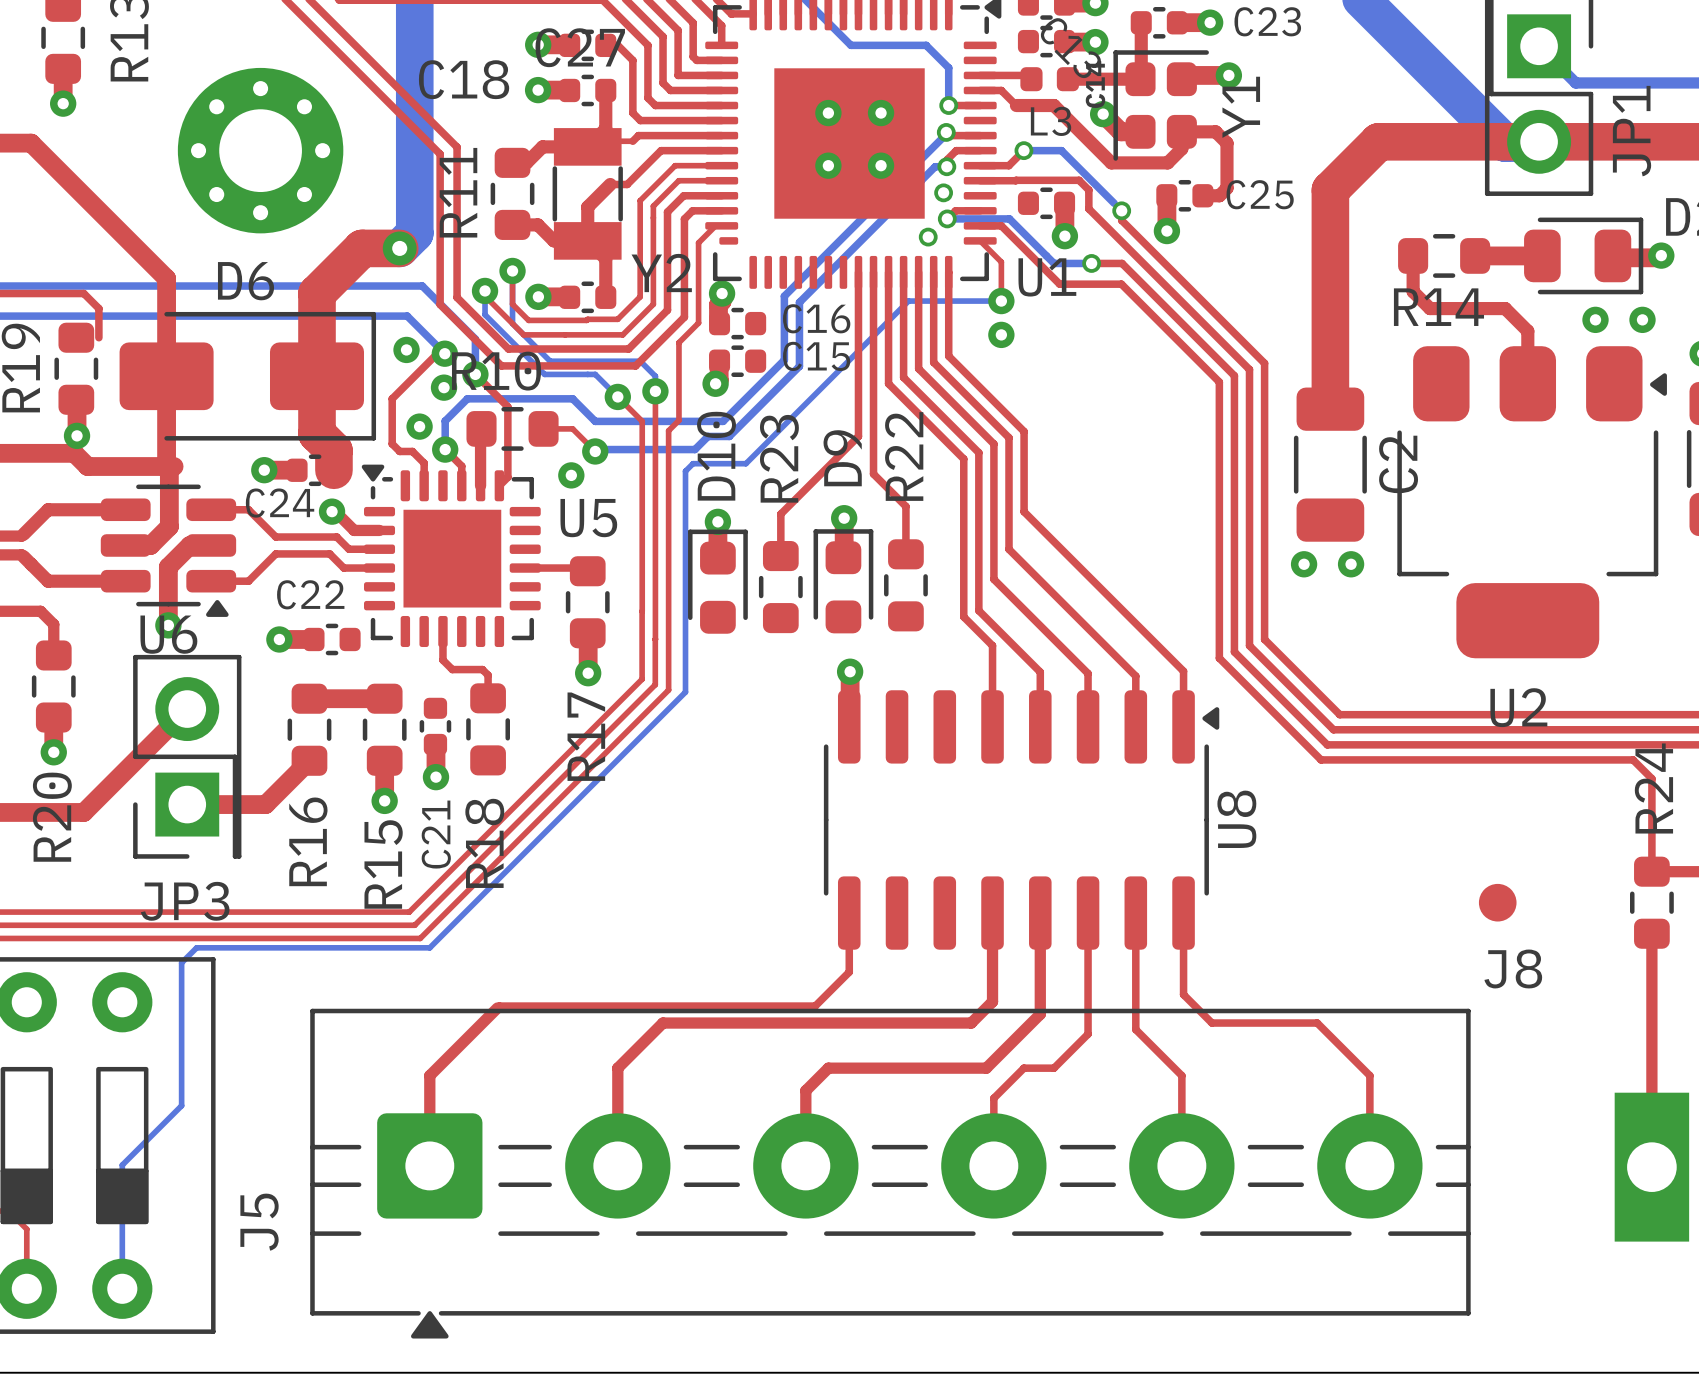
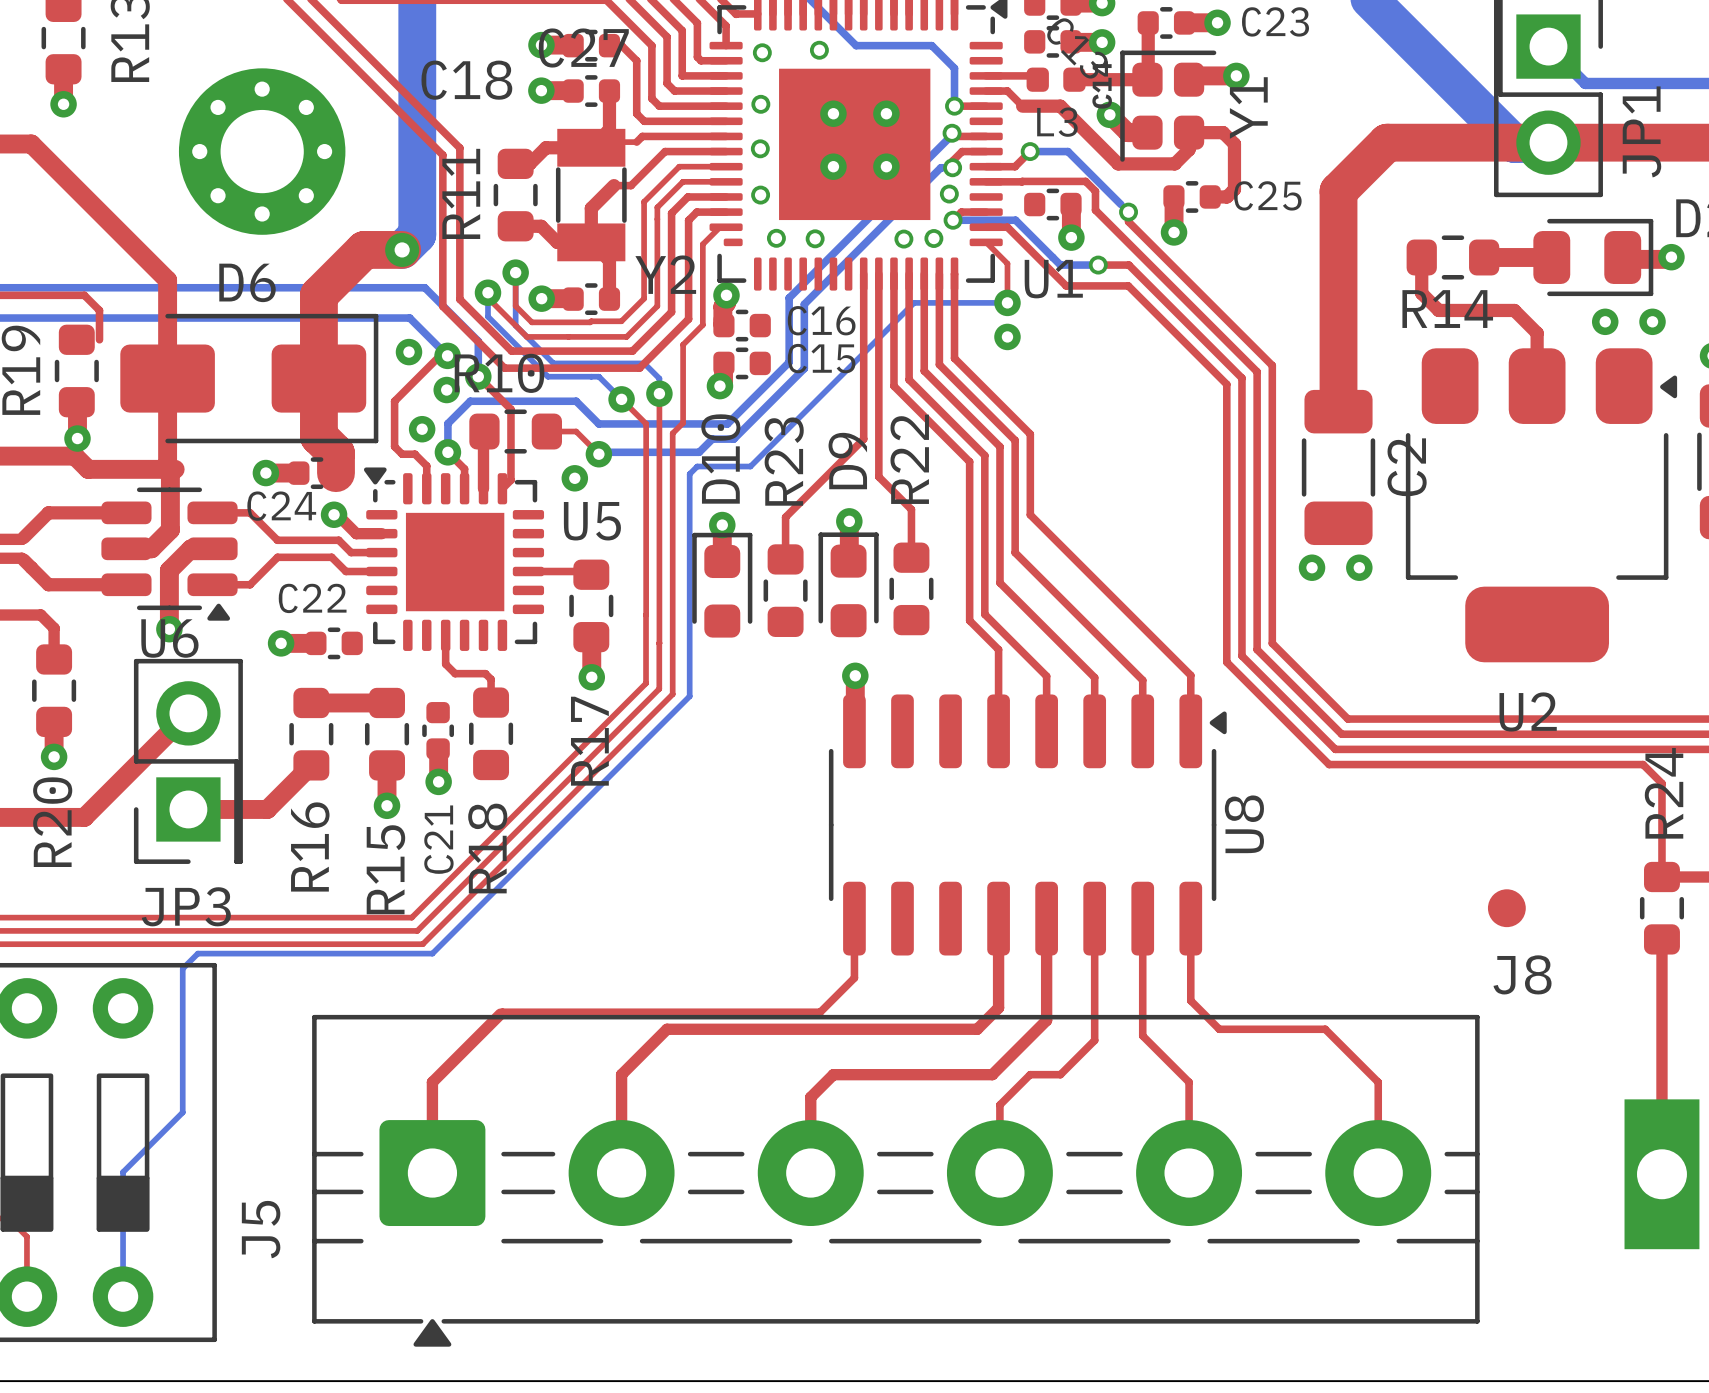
via: none -> (819, 50)
via: none -> (762, 52)
via: none -> (760, 104)
via: none -> (760, 148)
via: none -> (760, 195)
via: none -> (776, 238)
via: none -> (815, 238)
via: none -> (903, 239)

